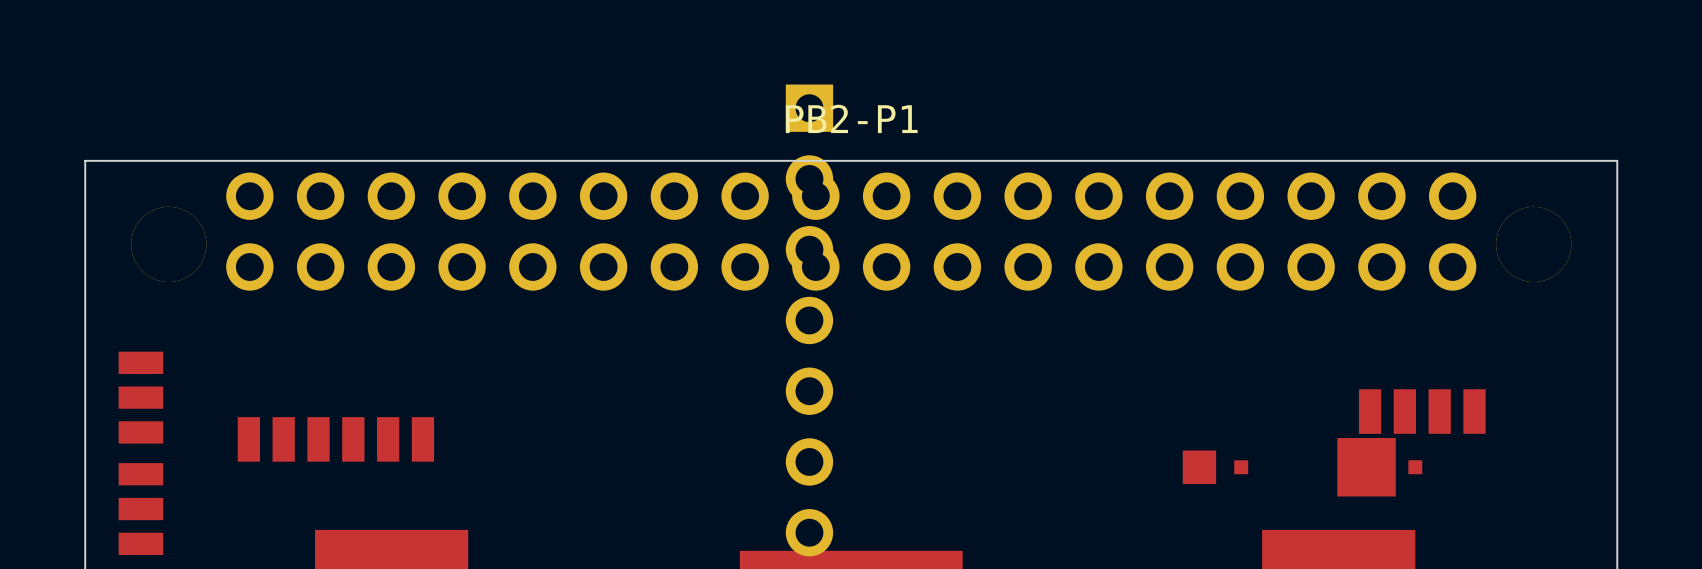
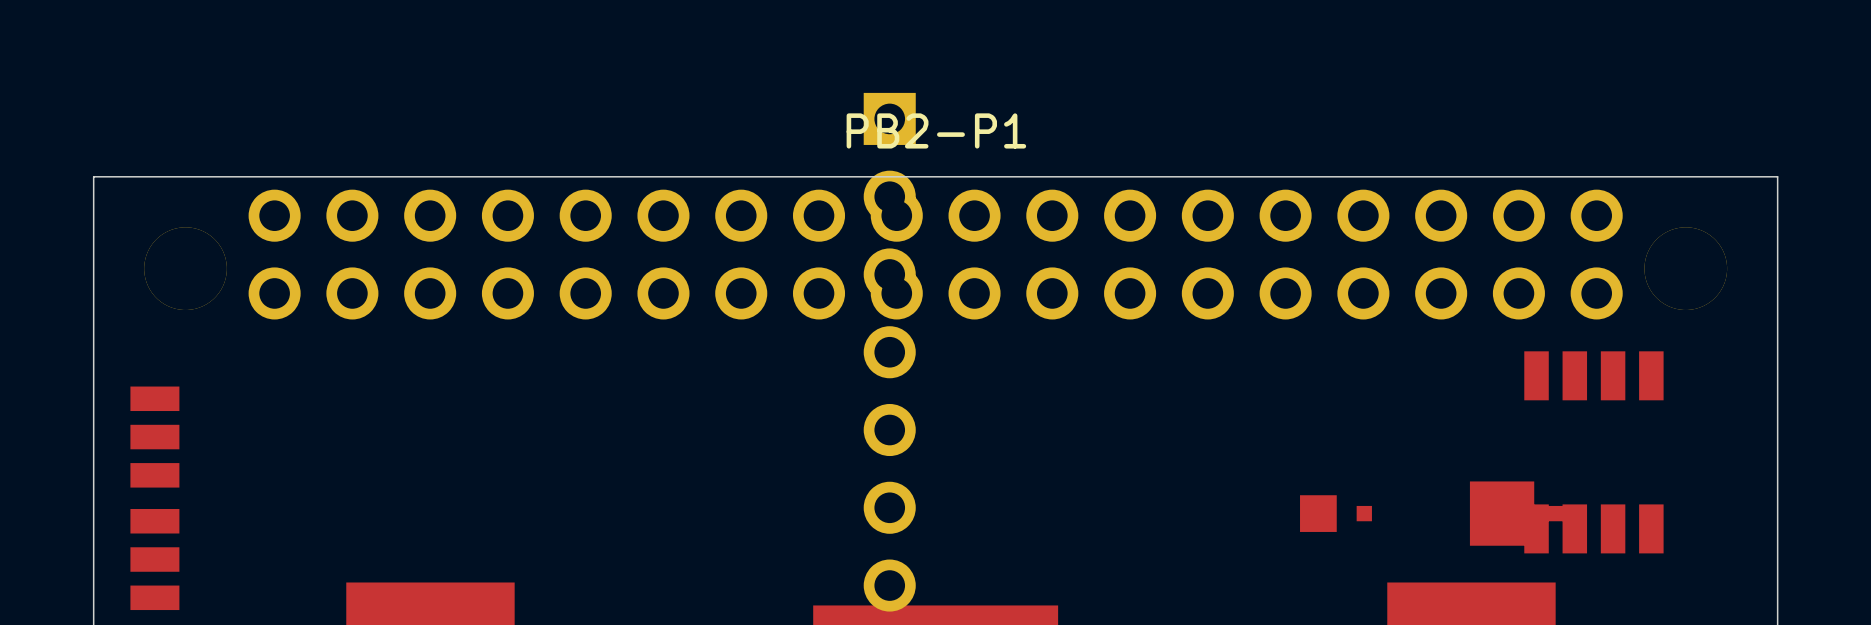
part: none -> (1593, 375)
part: (1422, 411) -> none
part: (335, 439) -> none
part: none -> (1593, 528)

